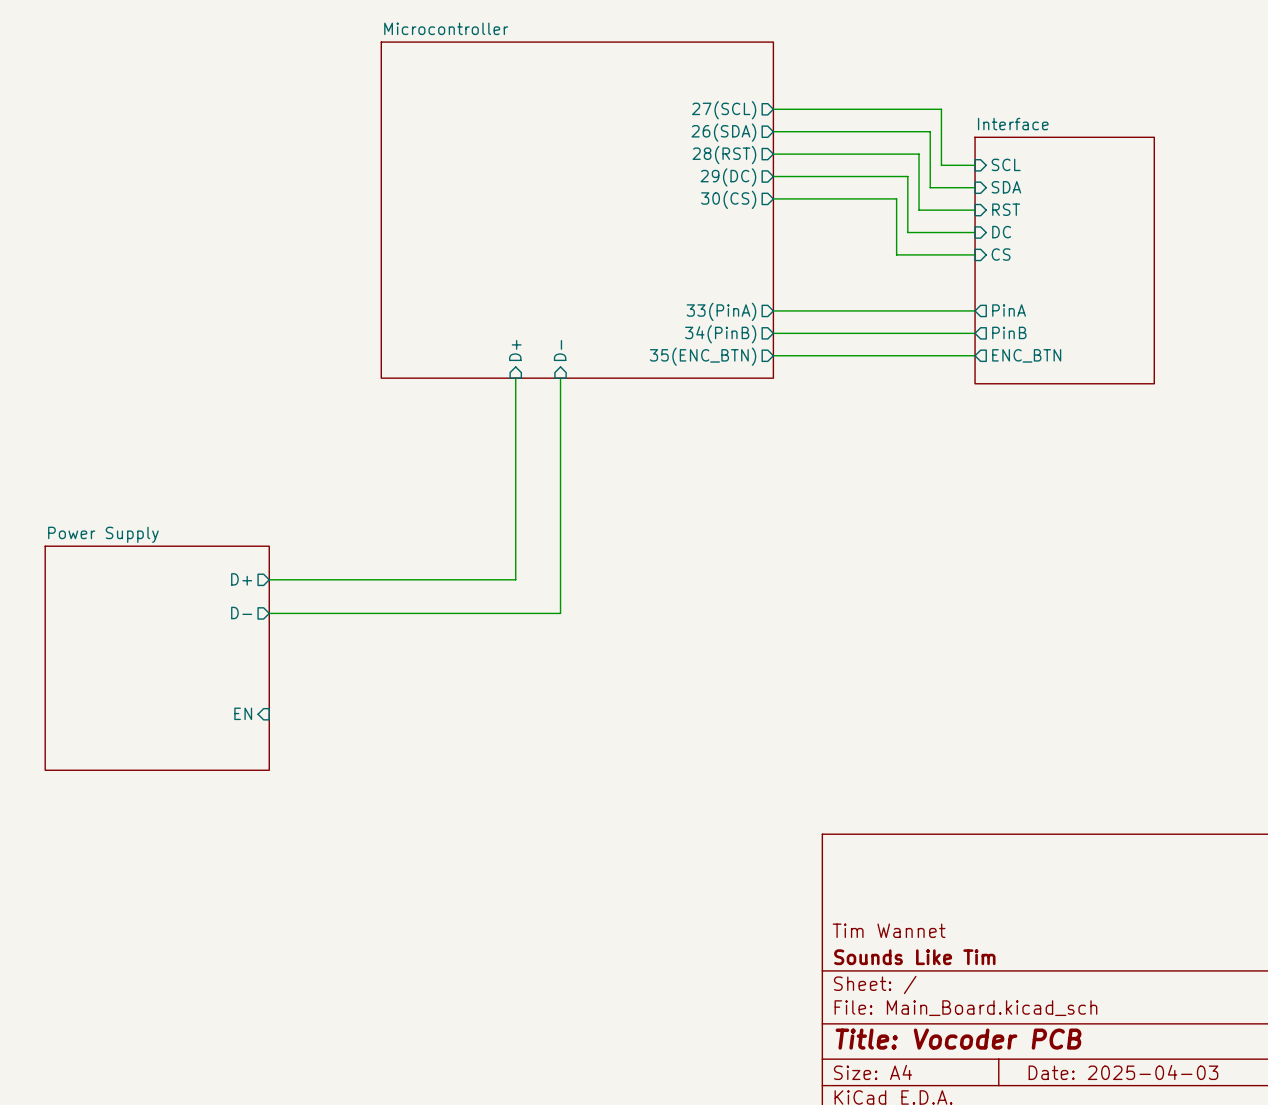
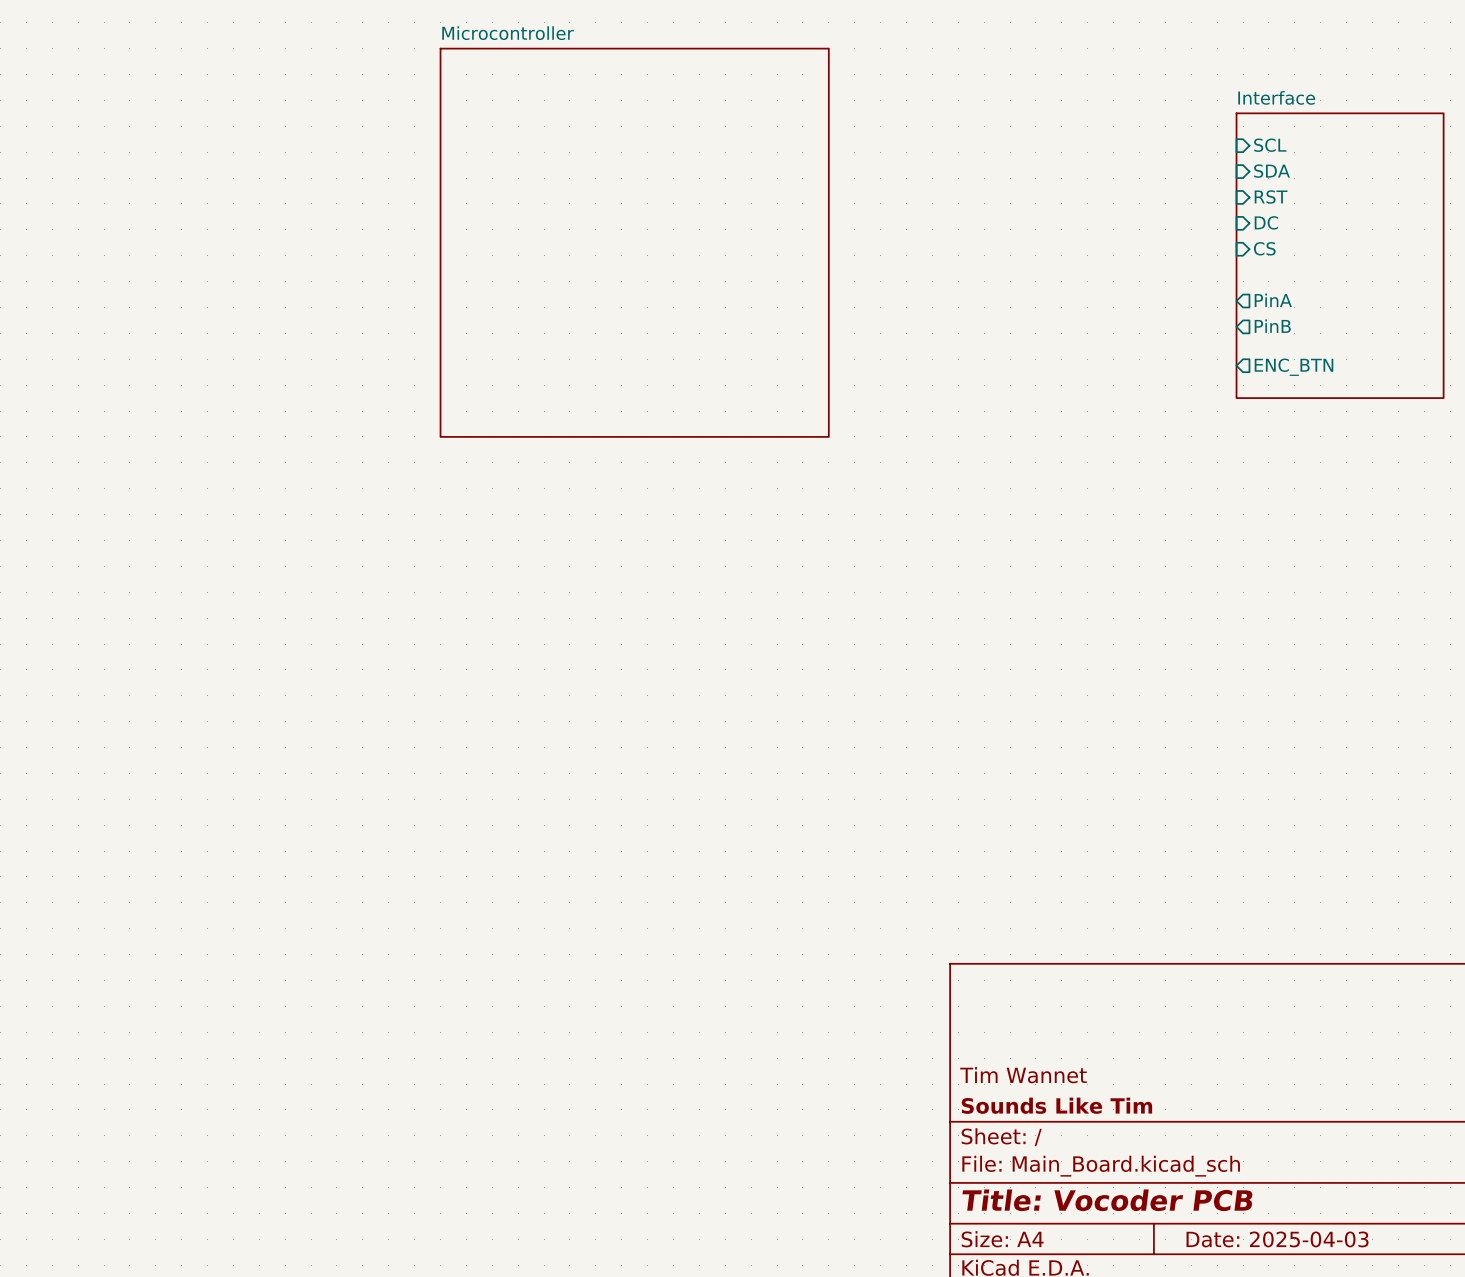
wire: (773, 109) (941, 109) (941, 165) (975, 165) -> none
sheet pin: 27(SCL) (724, 110) -> none
wire: (773, 131) (930, 131) (930, 187) (975, 187) -> none
sheet pin: 26(SDA) (723, 132) -> none
wire: (773, 154) (919, 154) (919, 210) (975, 210) -> none
sheet pin: 28(RST) (724, 155) -> none
sheet pin position: SCL (1006, 164) -> SCL (1270, 145)
wire: (773, 176) (907, 176) (907, 232) (975, 232) -> none
sheet pin: 29(DC) (728, 177) -> none
sheet pin position: SDA (1006, 187) -> SDA (1272, 171)
wire: (773, 198) (896, 198) (896, 254) (975, 254) -> none
sheet pin: 30(CS) (728, 199) -> none
sheet pin position: RST (1006, 209) -> RST (1271, 196)
sheet Microcontroller: none -> (634, 242)
sheet Microcontroller: (577, 210) -> none
sheet pin position: DC (1001, 232) -> DC (1266, 222)
sheet pin position: CS (1001, 254) -> CS (1264, 248)
sheet Interface position: (1064, 260) -> (1340, 255)
wire: (773, 310) (975, 310) -> none
sheet pin position: PinA (1009, 310) -> PinA (1273, 300)
sheet pin: 33(PinA) (721, 311) -> none
sheet pin position: PinB (1009, 332) -> PinB (1272, 326)
wire: (773, 333) (975, 333) -> none
sheet pin: 34(PinB) (720, 334) -> none
sheet pin: D+ (515, 350) -> none
sheet pin: D- (560, 350) -> none
wire: (773, 355) (975, 355) -> none
sheet pin position: ENC_BTN (1026, 355) -> ENC_BTN (1294, 367)
sheet pin: 35(ENC_BTN) (703, 356) -> none
wire: (515, 378) (515, 579) (269, 579) -> none
wire: (560, 378) (560, 613) (269, 613) -> none
sheet pin: D+ (241, 579) -> none
sheet pin: D- (241, 613) -> none
sheet Power Supply: (157, 658) -> none
sheet pin: EN (243, 713) -> none

